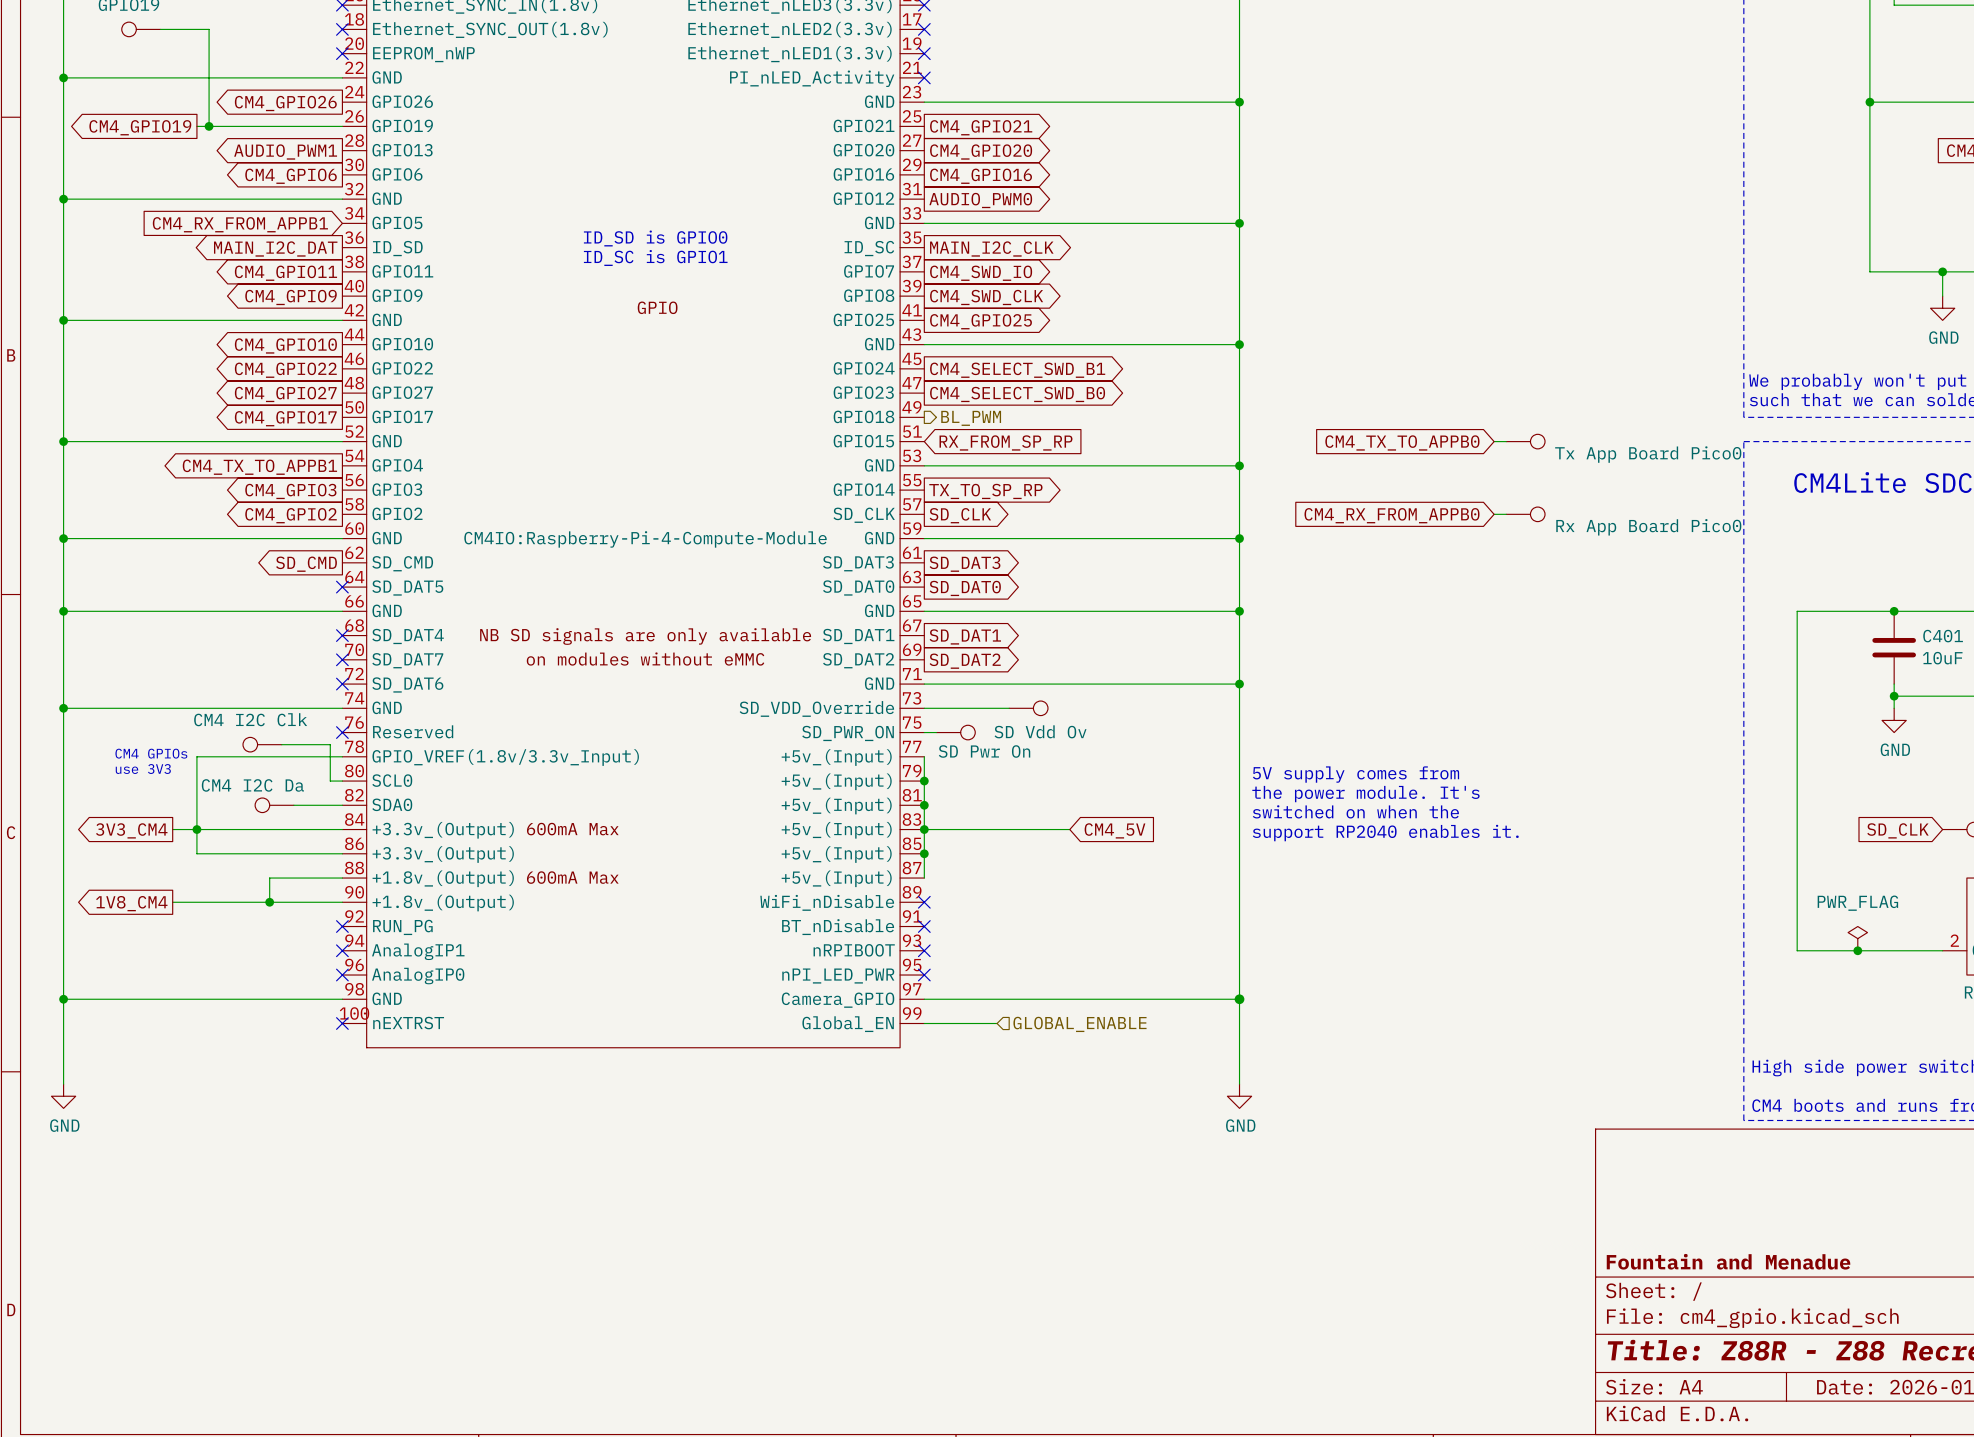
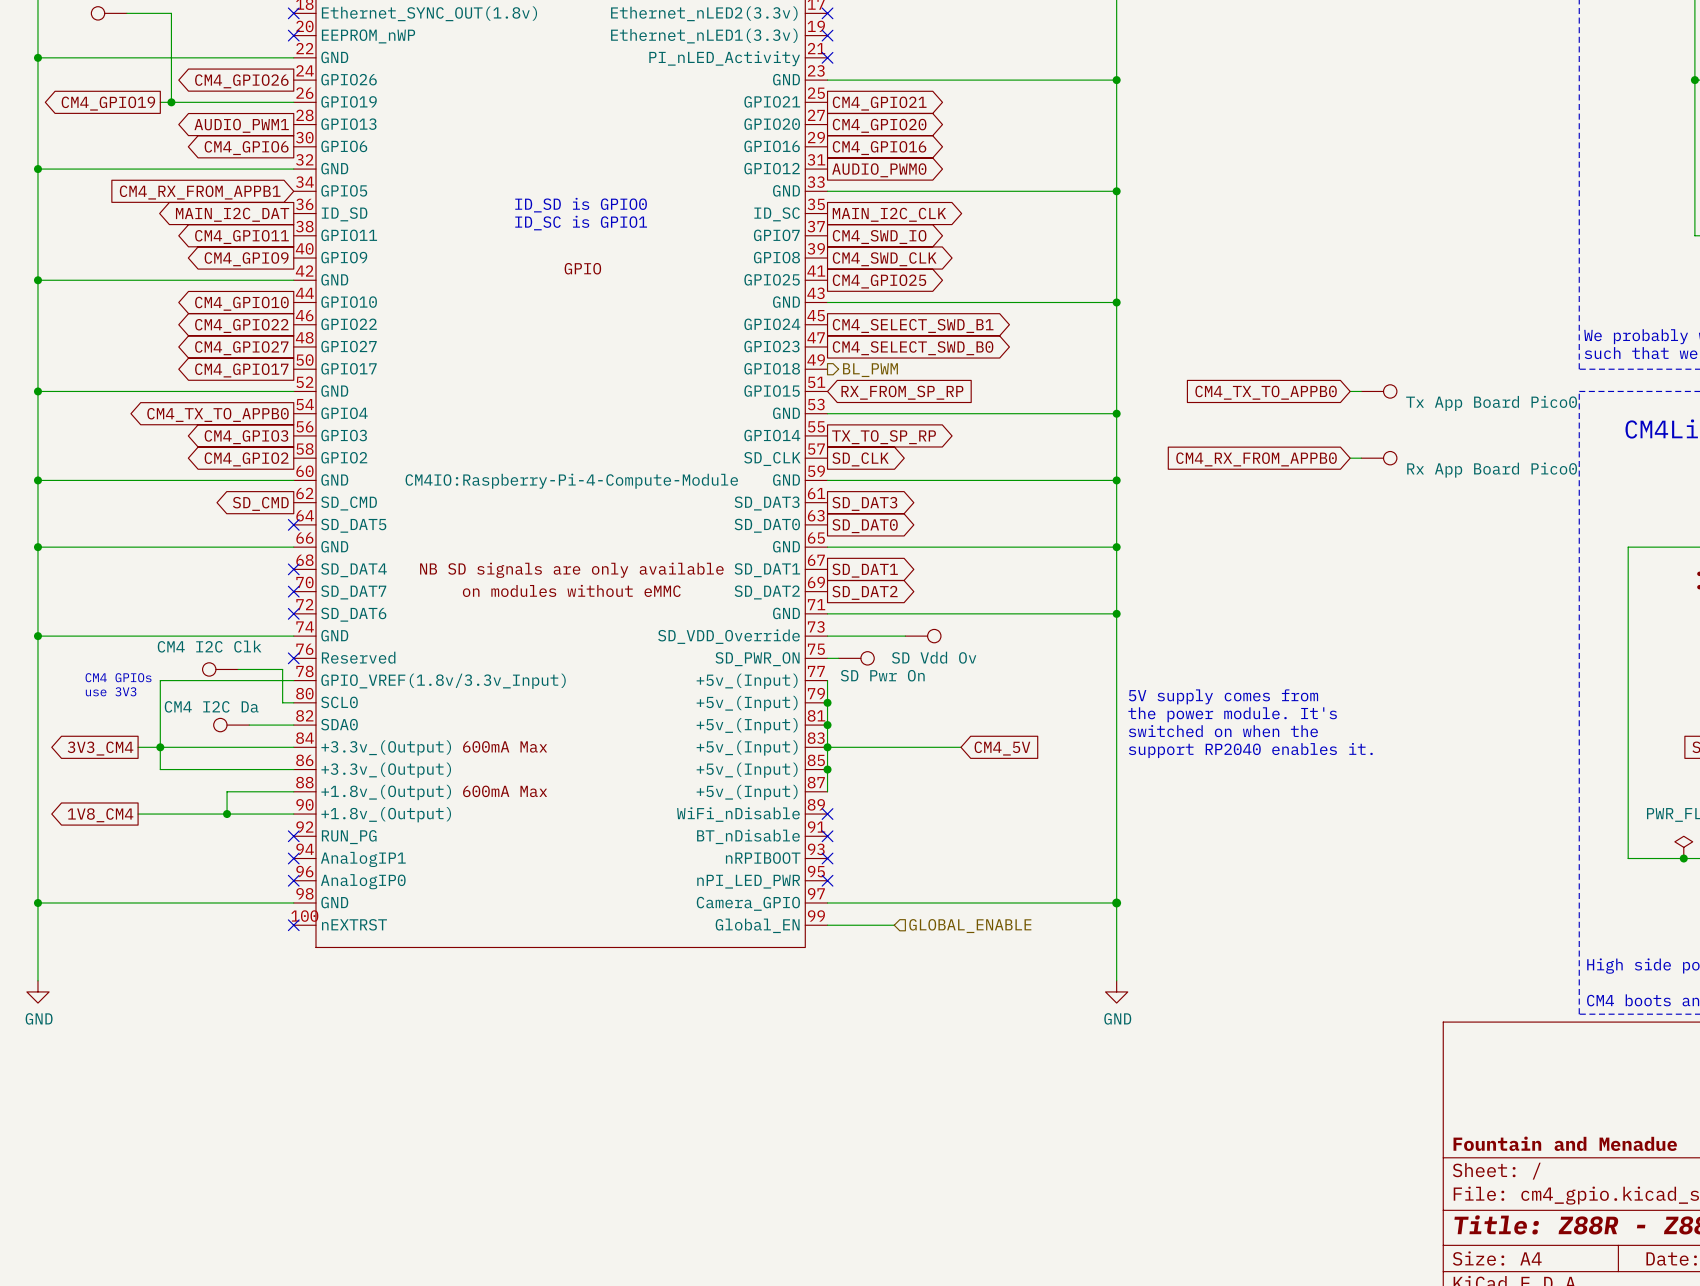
global label: CM4_TX_TO_APPB1 (259, 467) -> CM4_TX_TO_APPB0 (218, 414)

